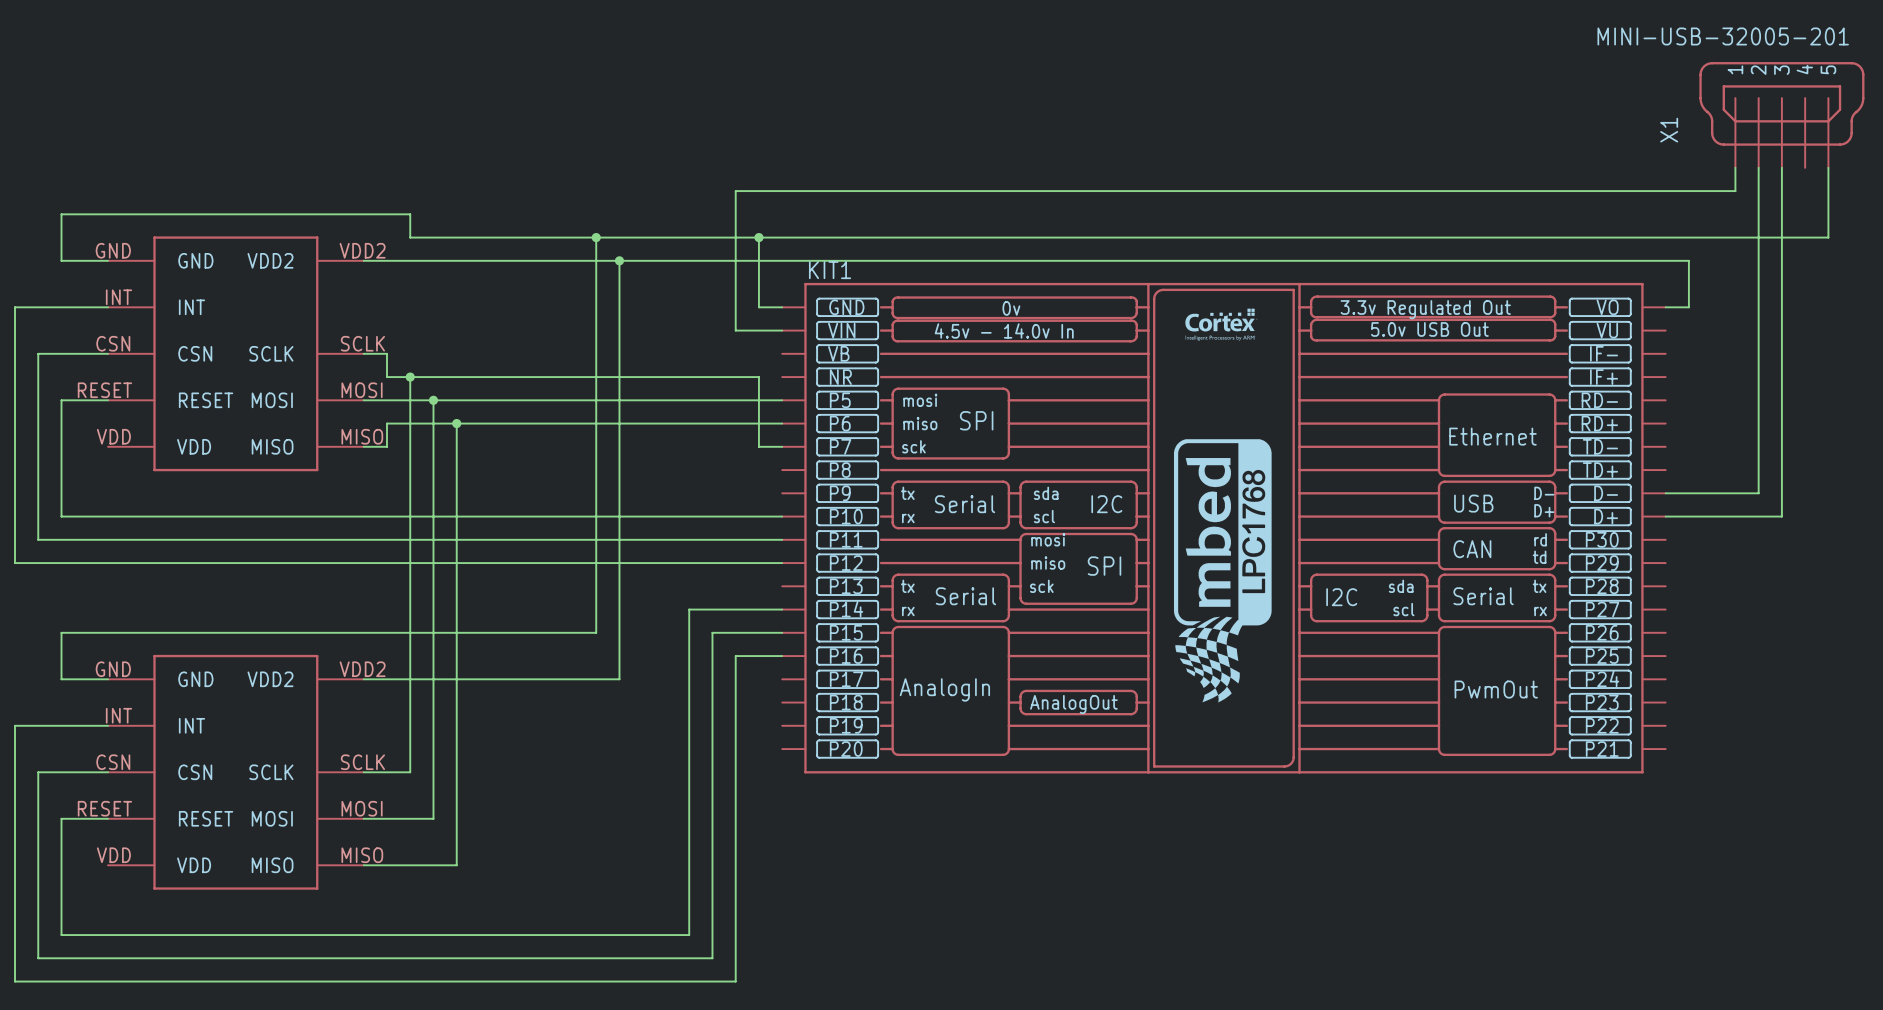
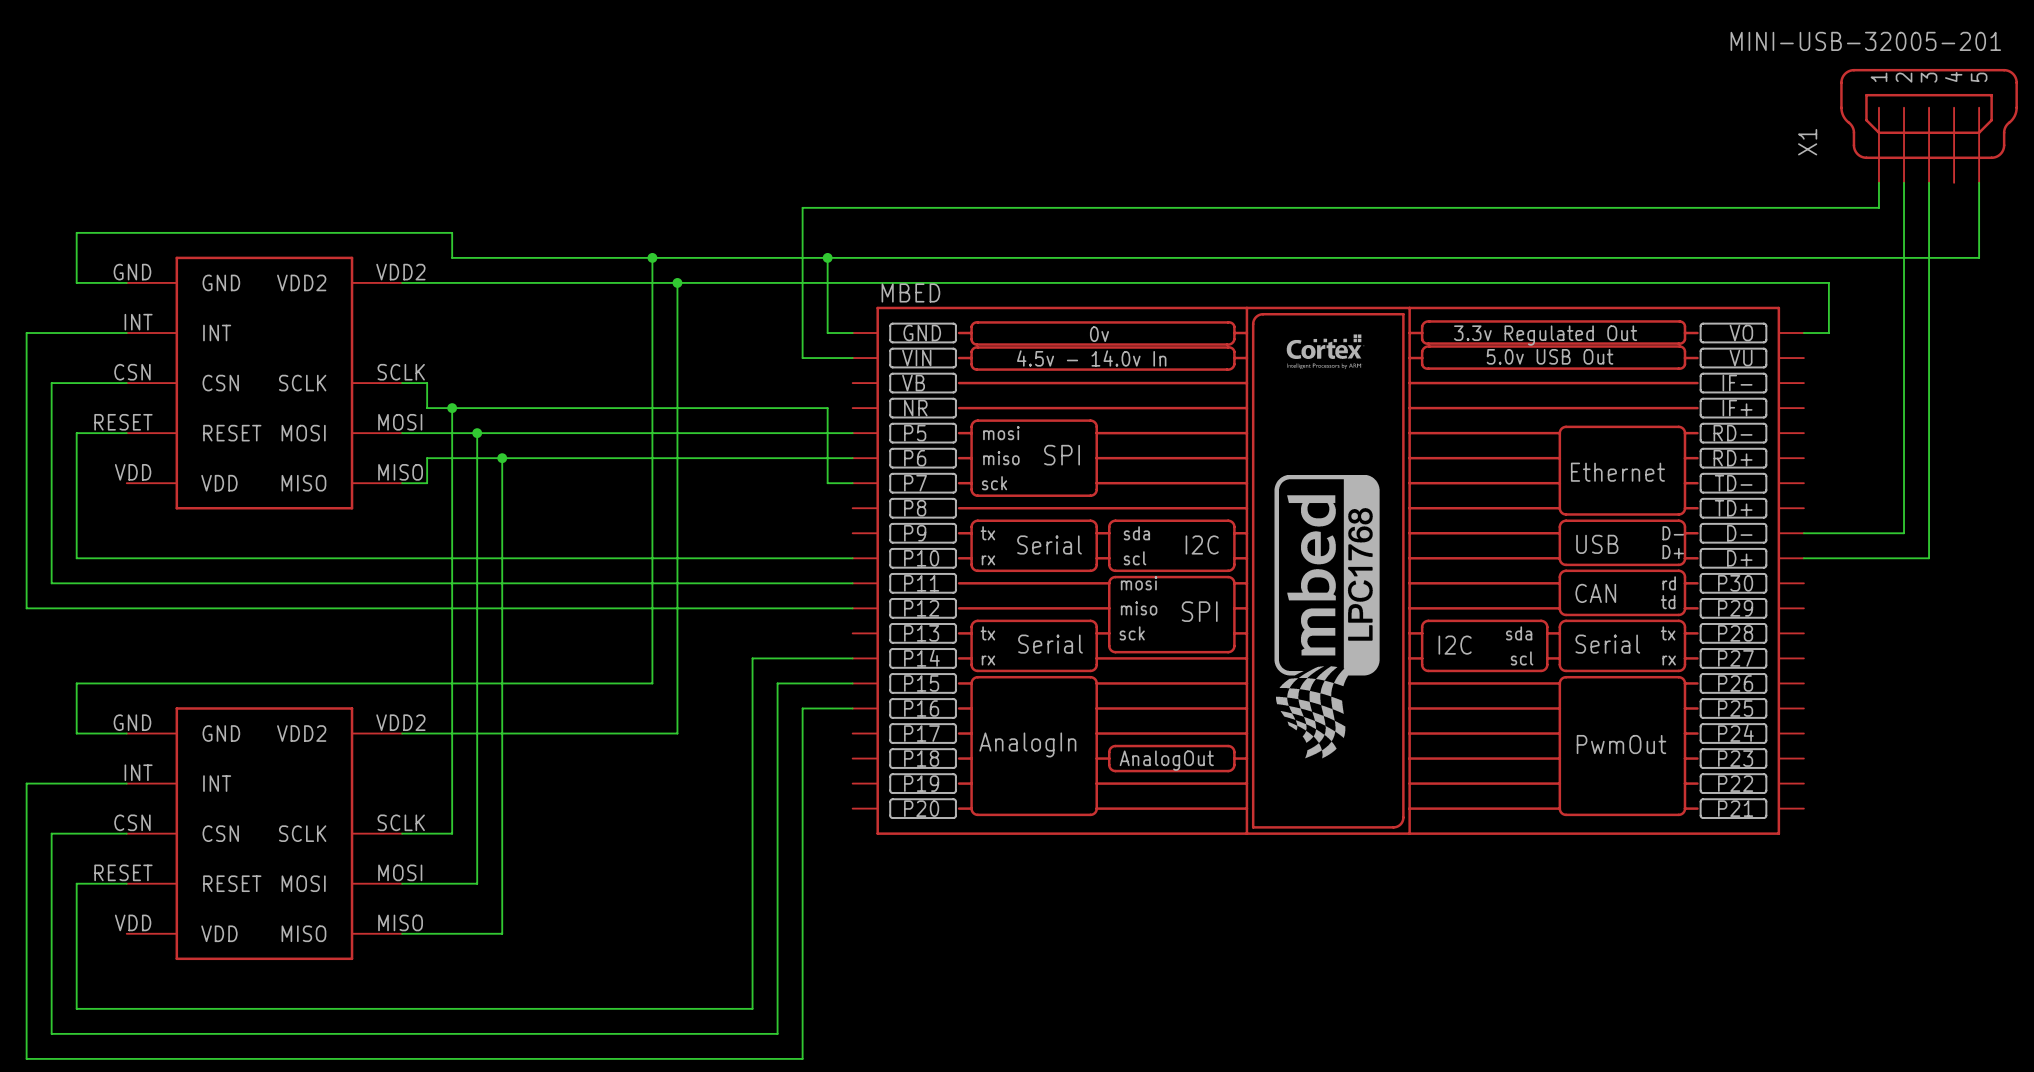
KIT1 name: KIT1 (830, 270) -> MBED (910, 292)

